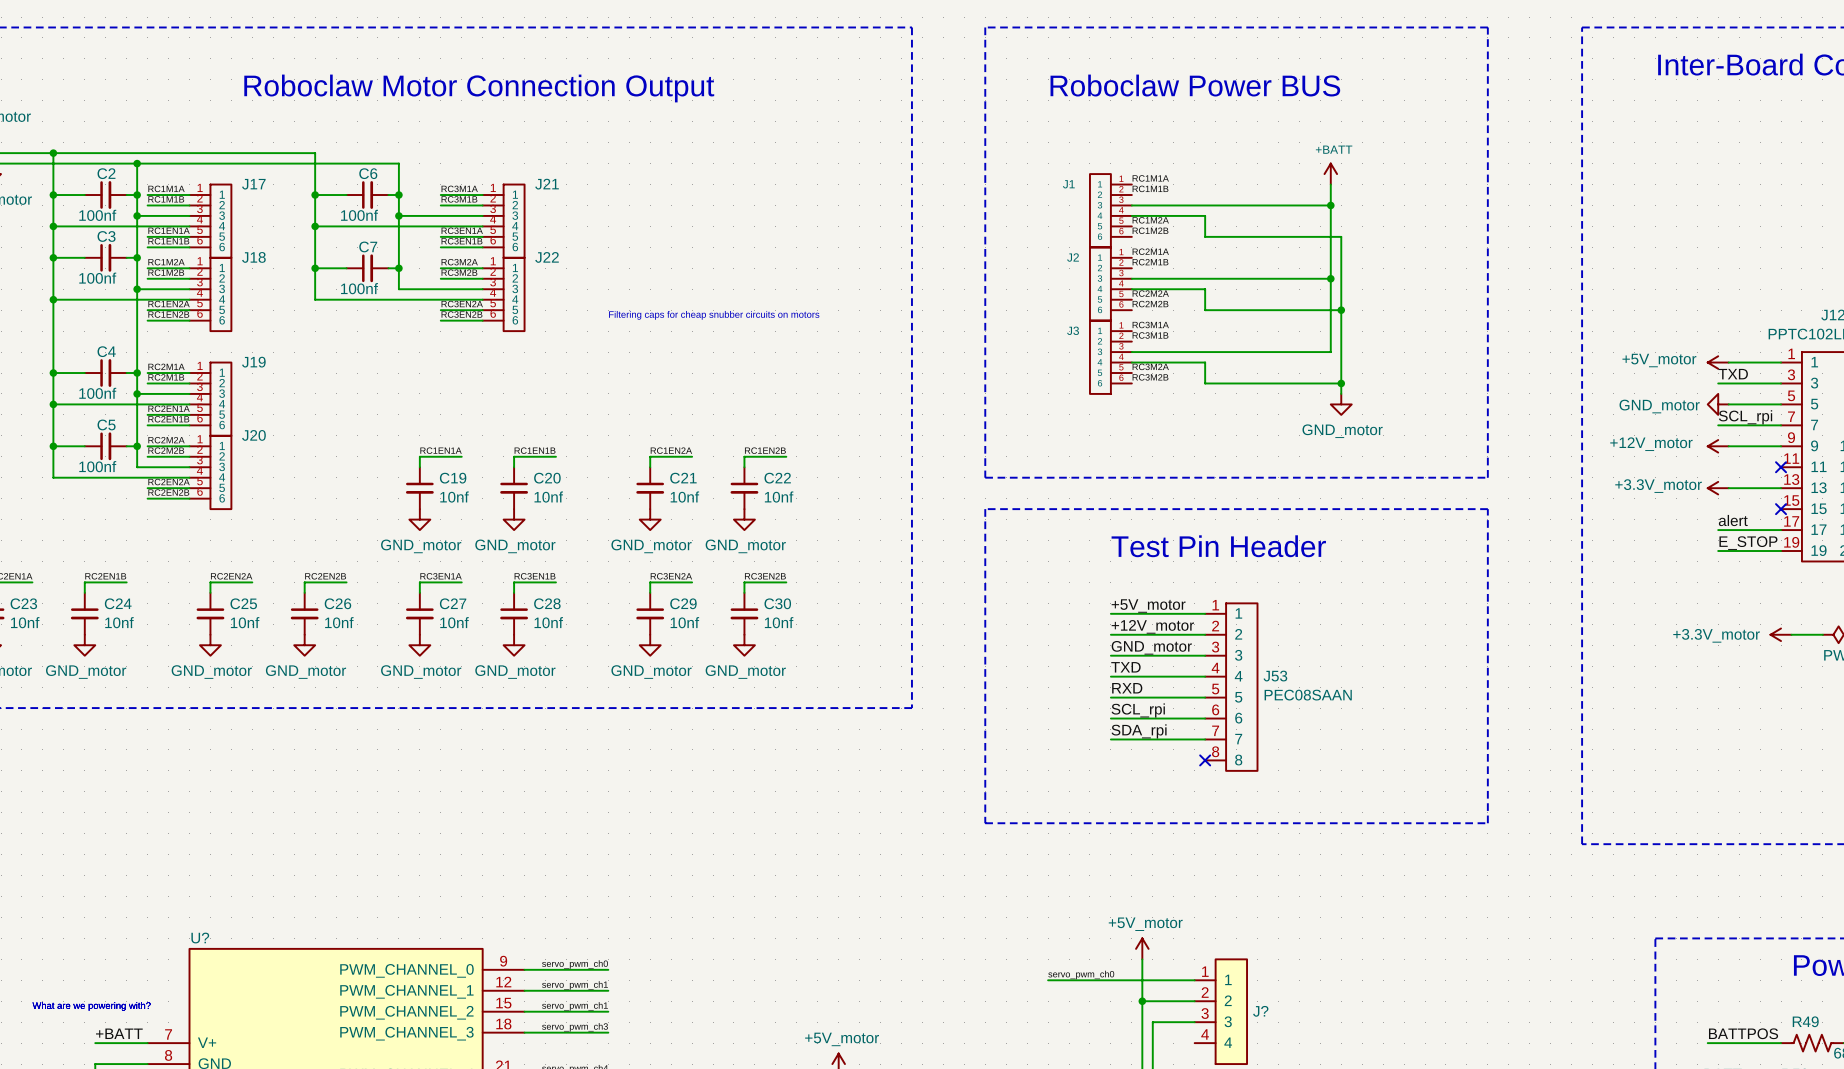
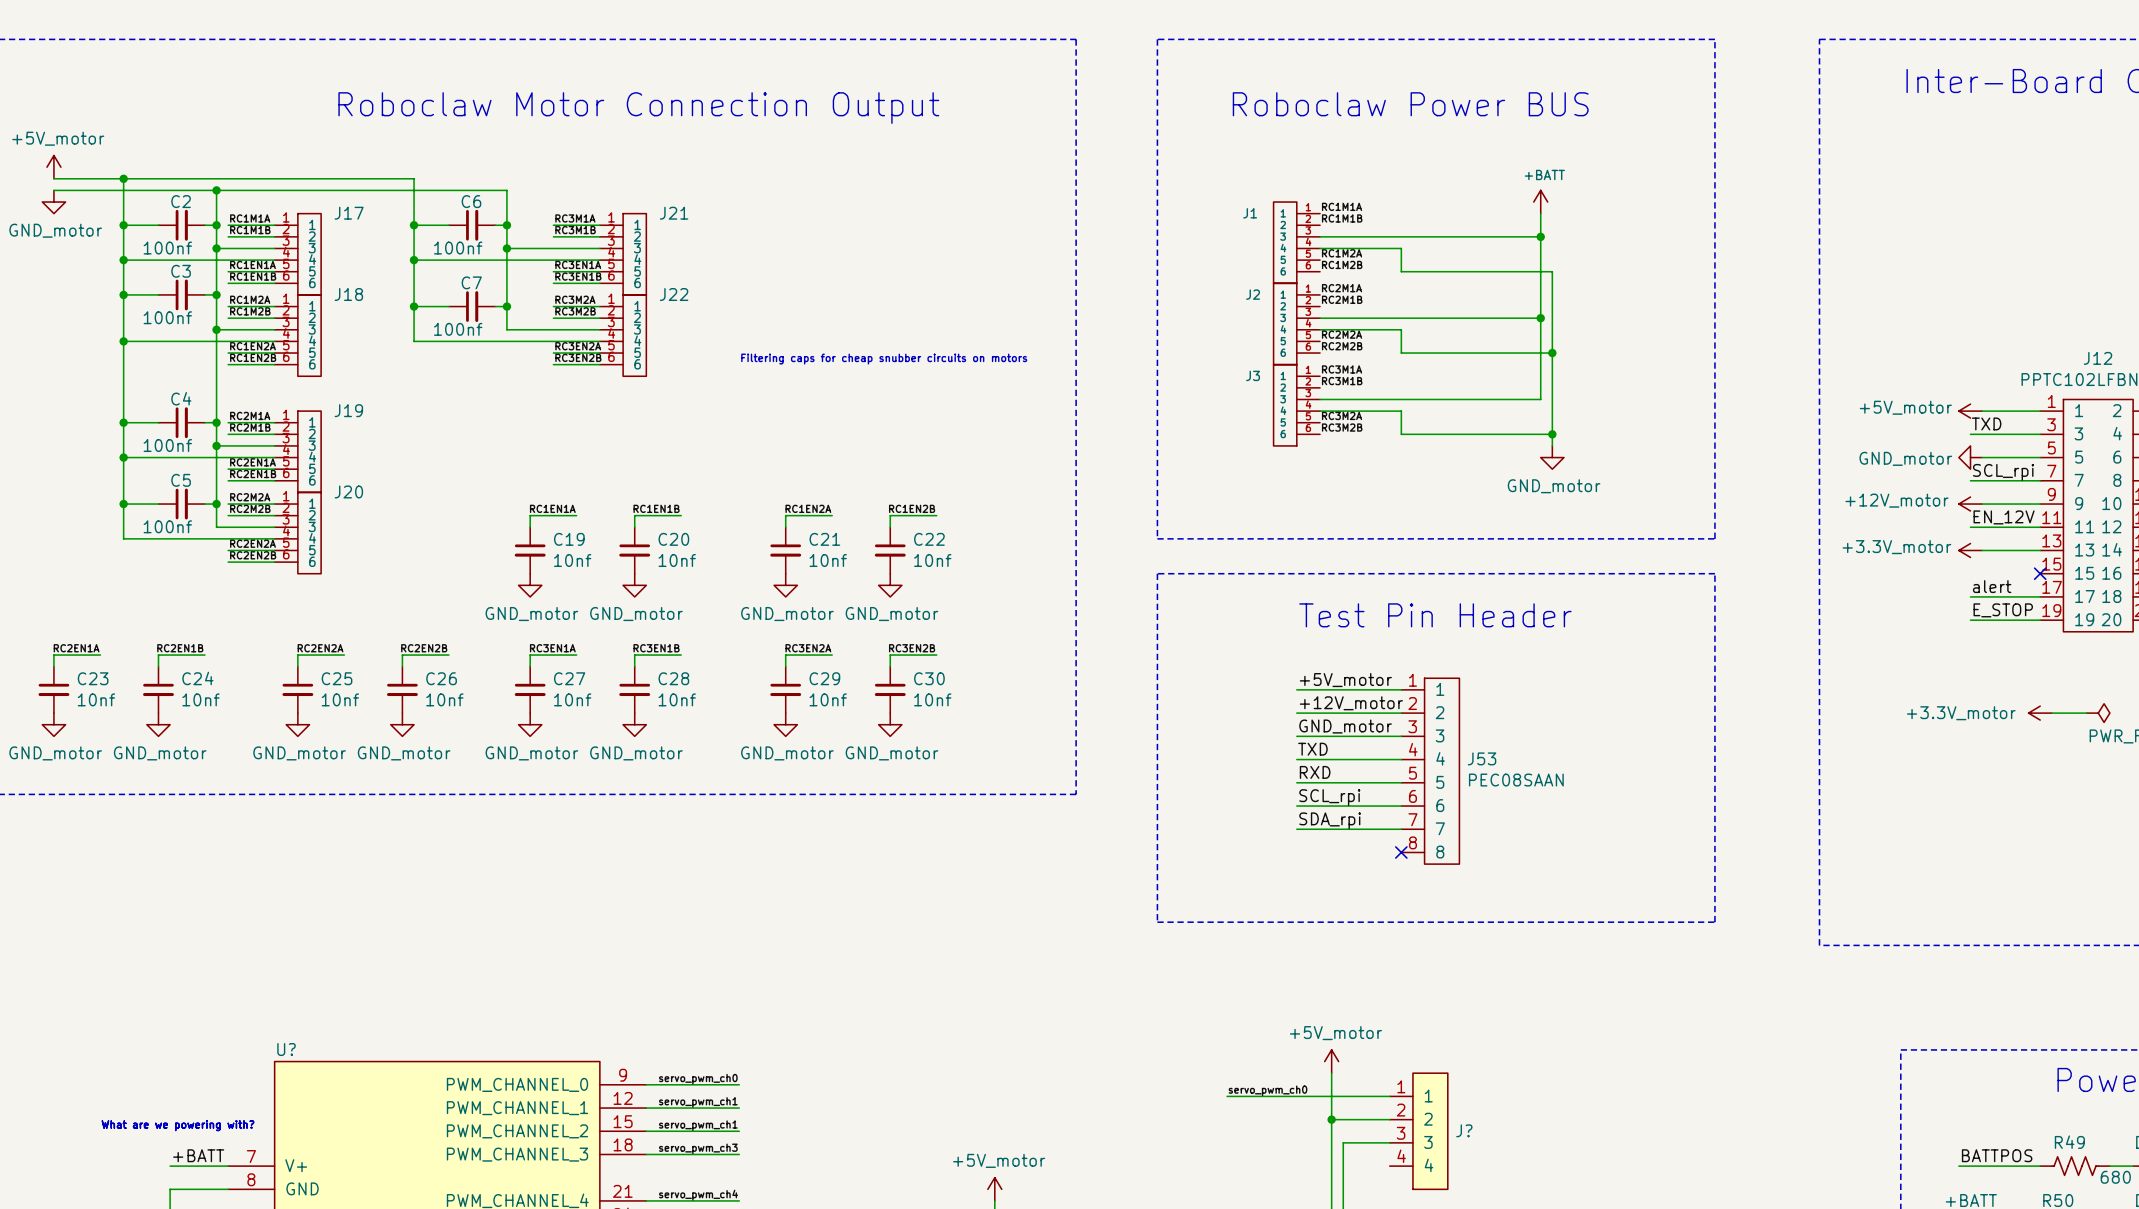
label: none -> EN_12V (2004, 517)
wire: none -> (1970, 527) (2040, 527)
no-connect mark: (1781, 467) -> none

